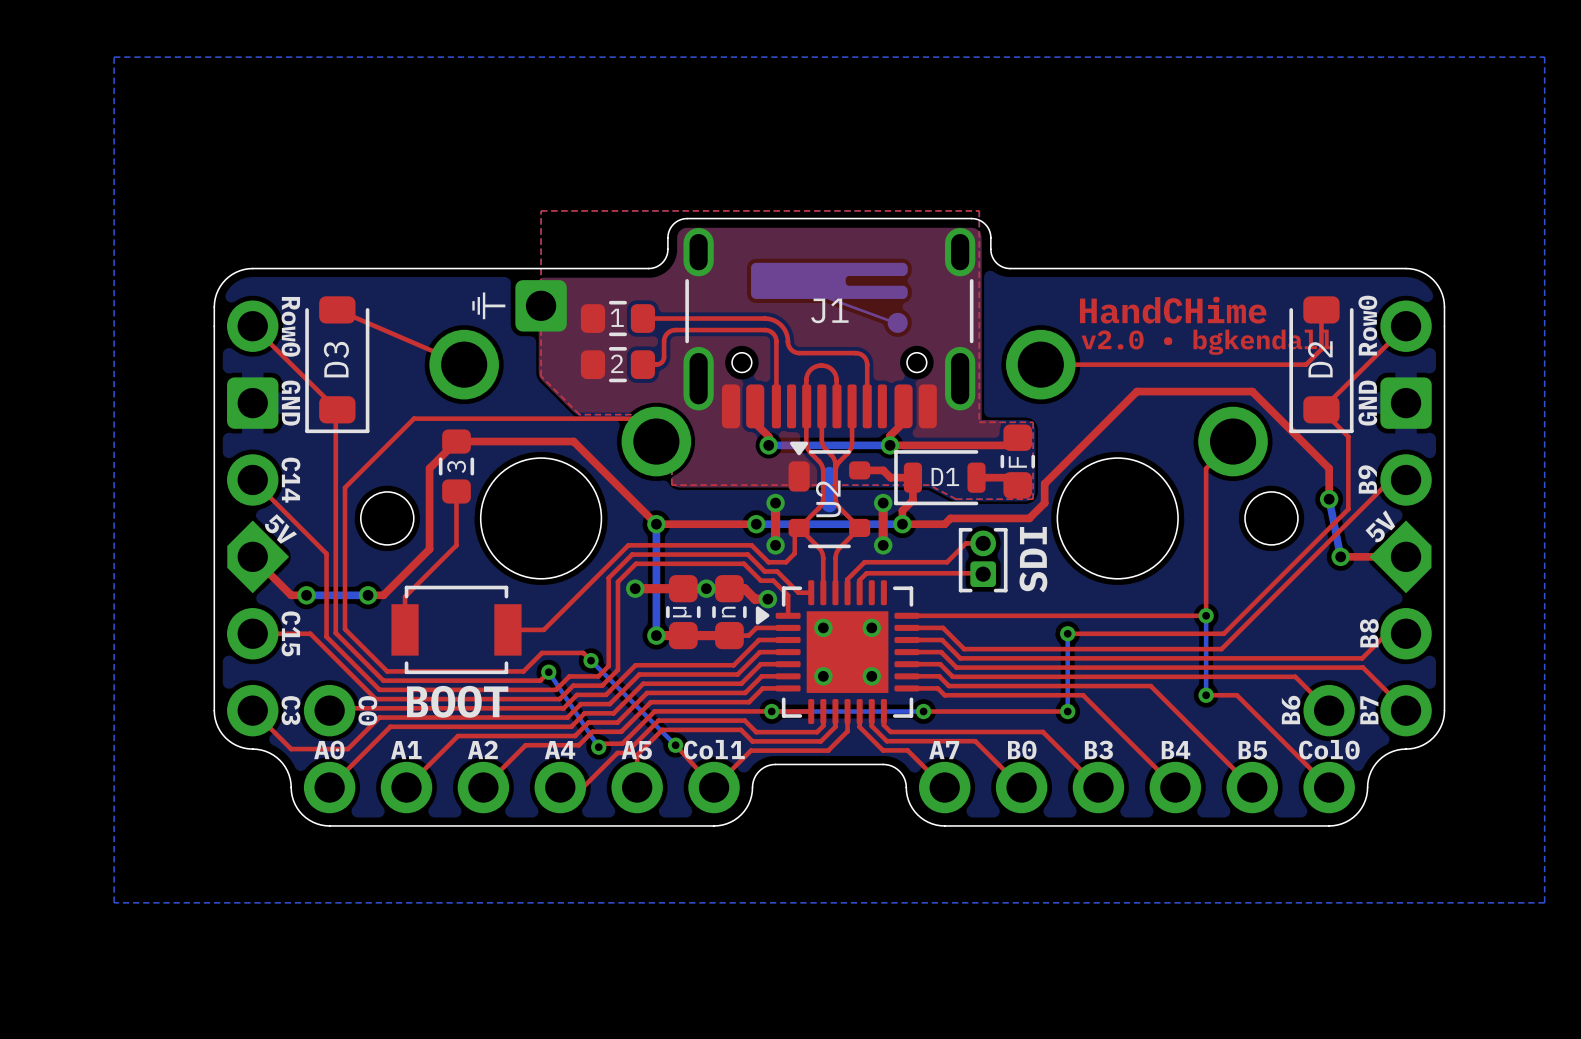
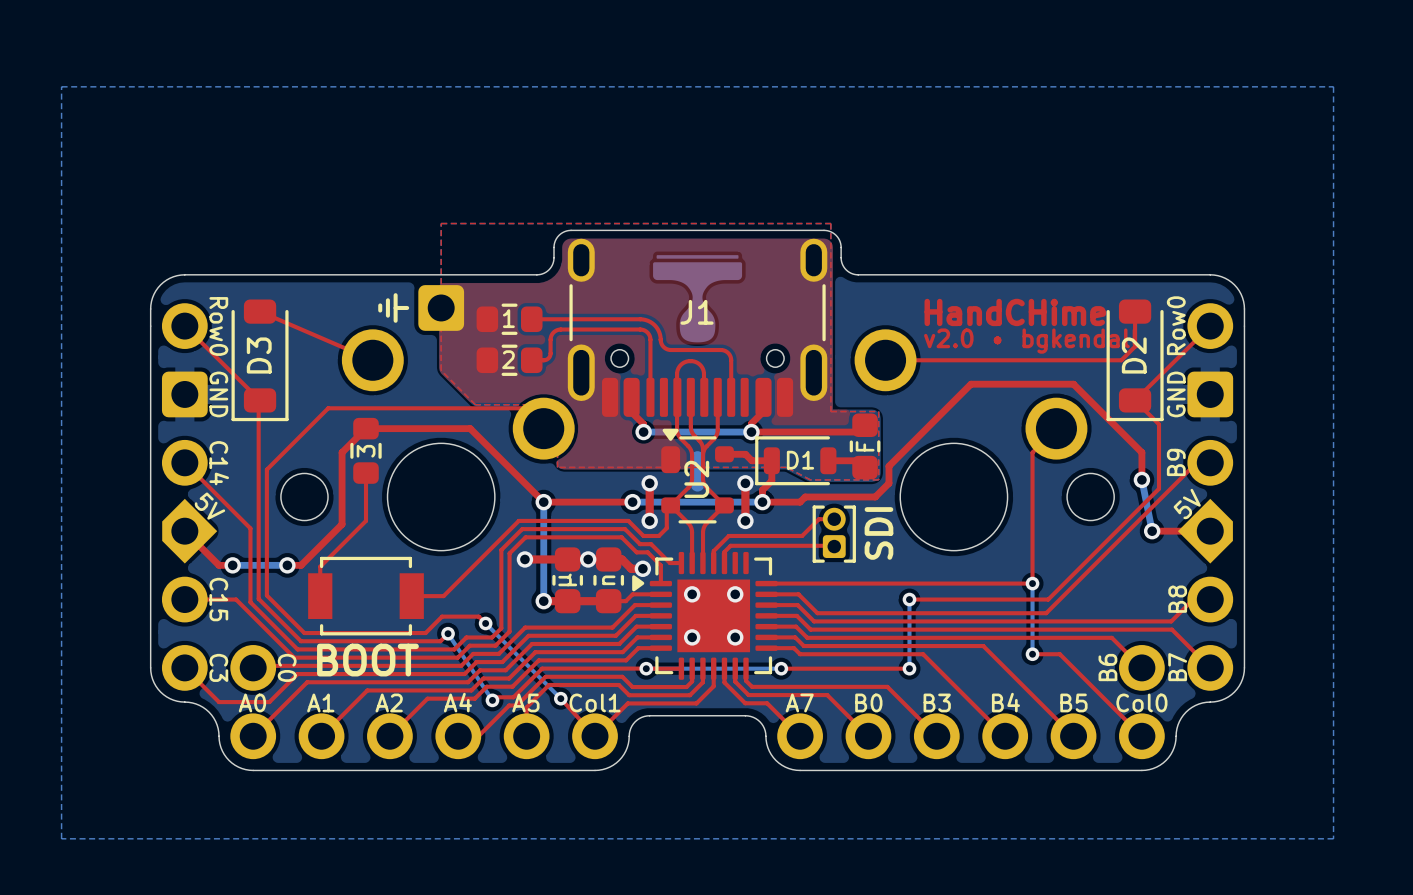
drawing: none -> [653, 255, 743, 343]
drawing: [751, 262, 908, 333] -> none
bottom track: (829, 298) (897, 323) -> none

